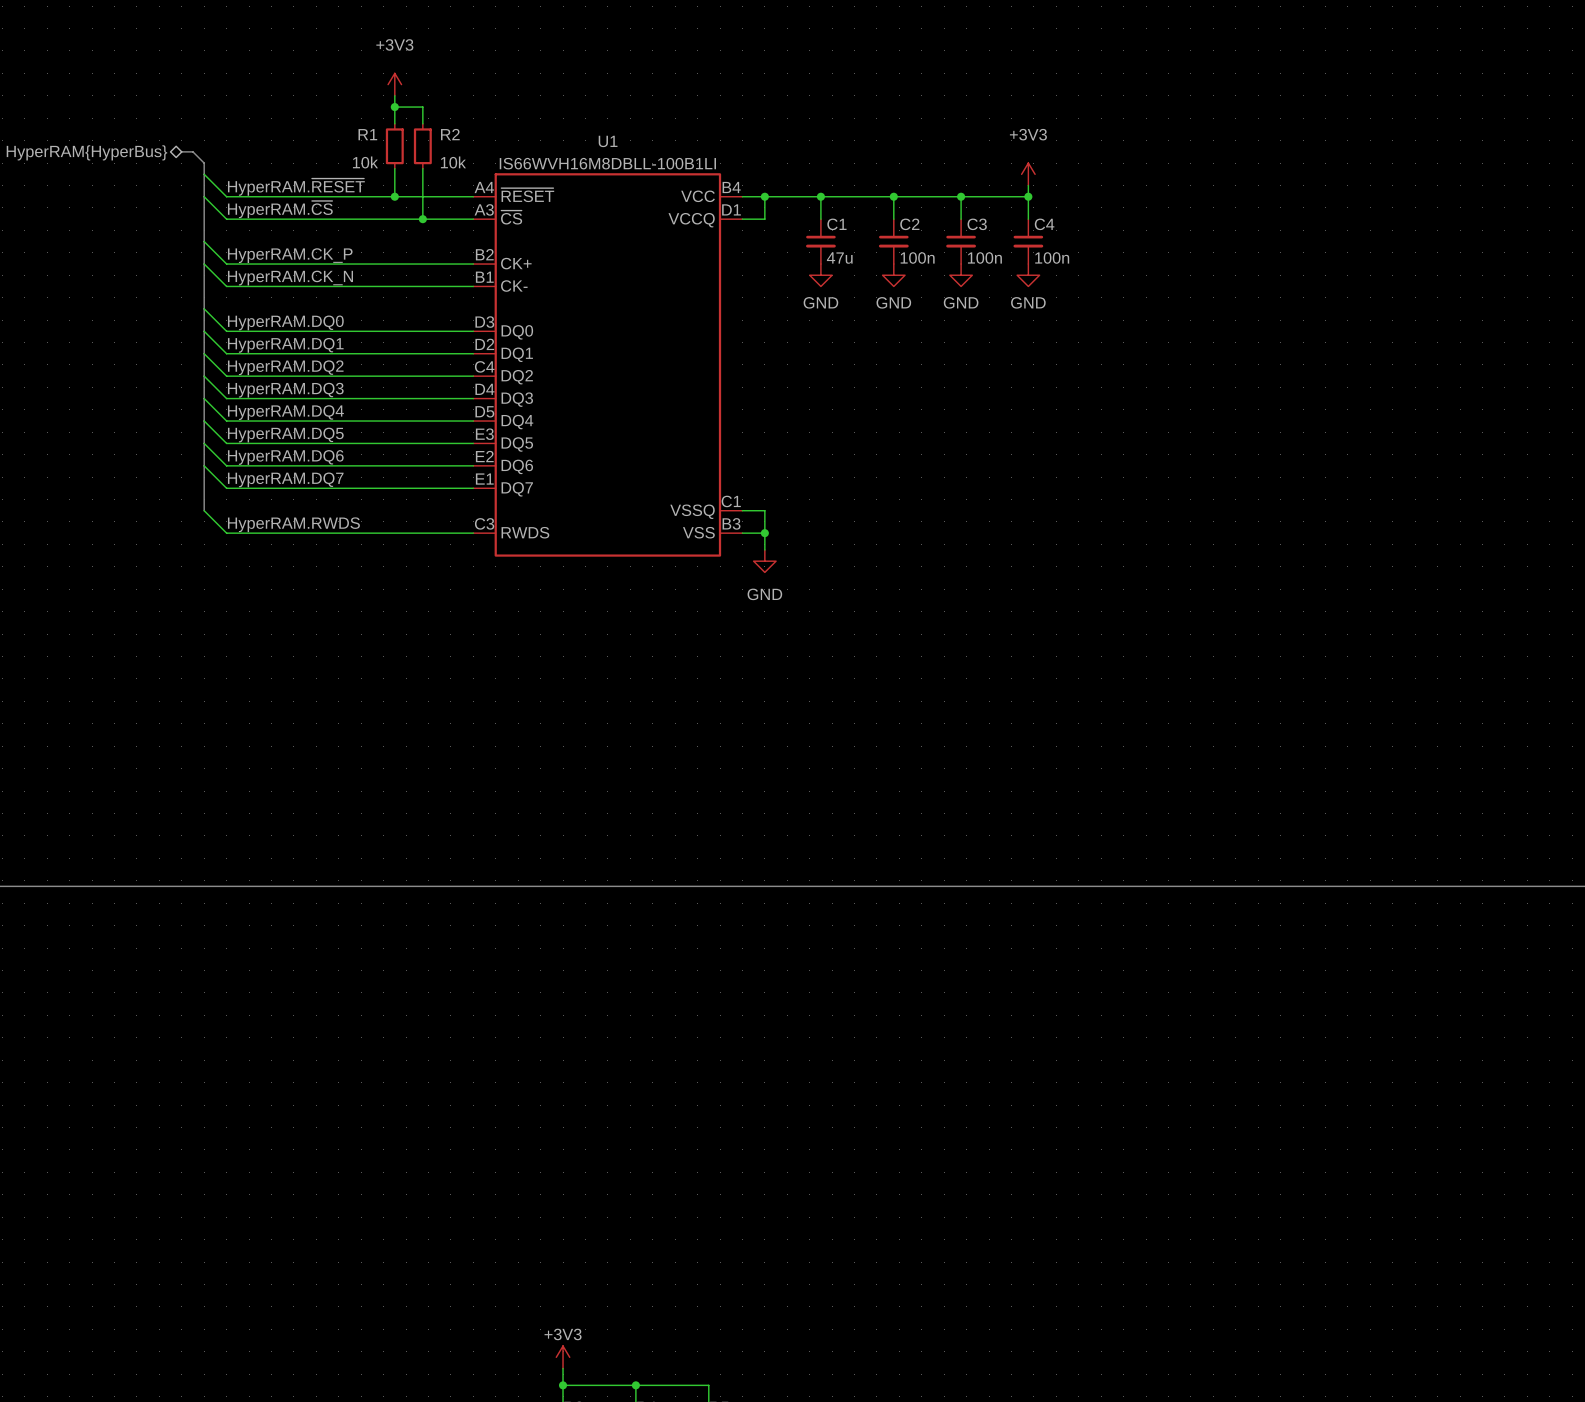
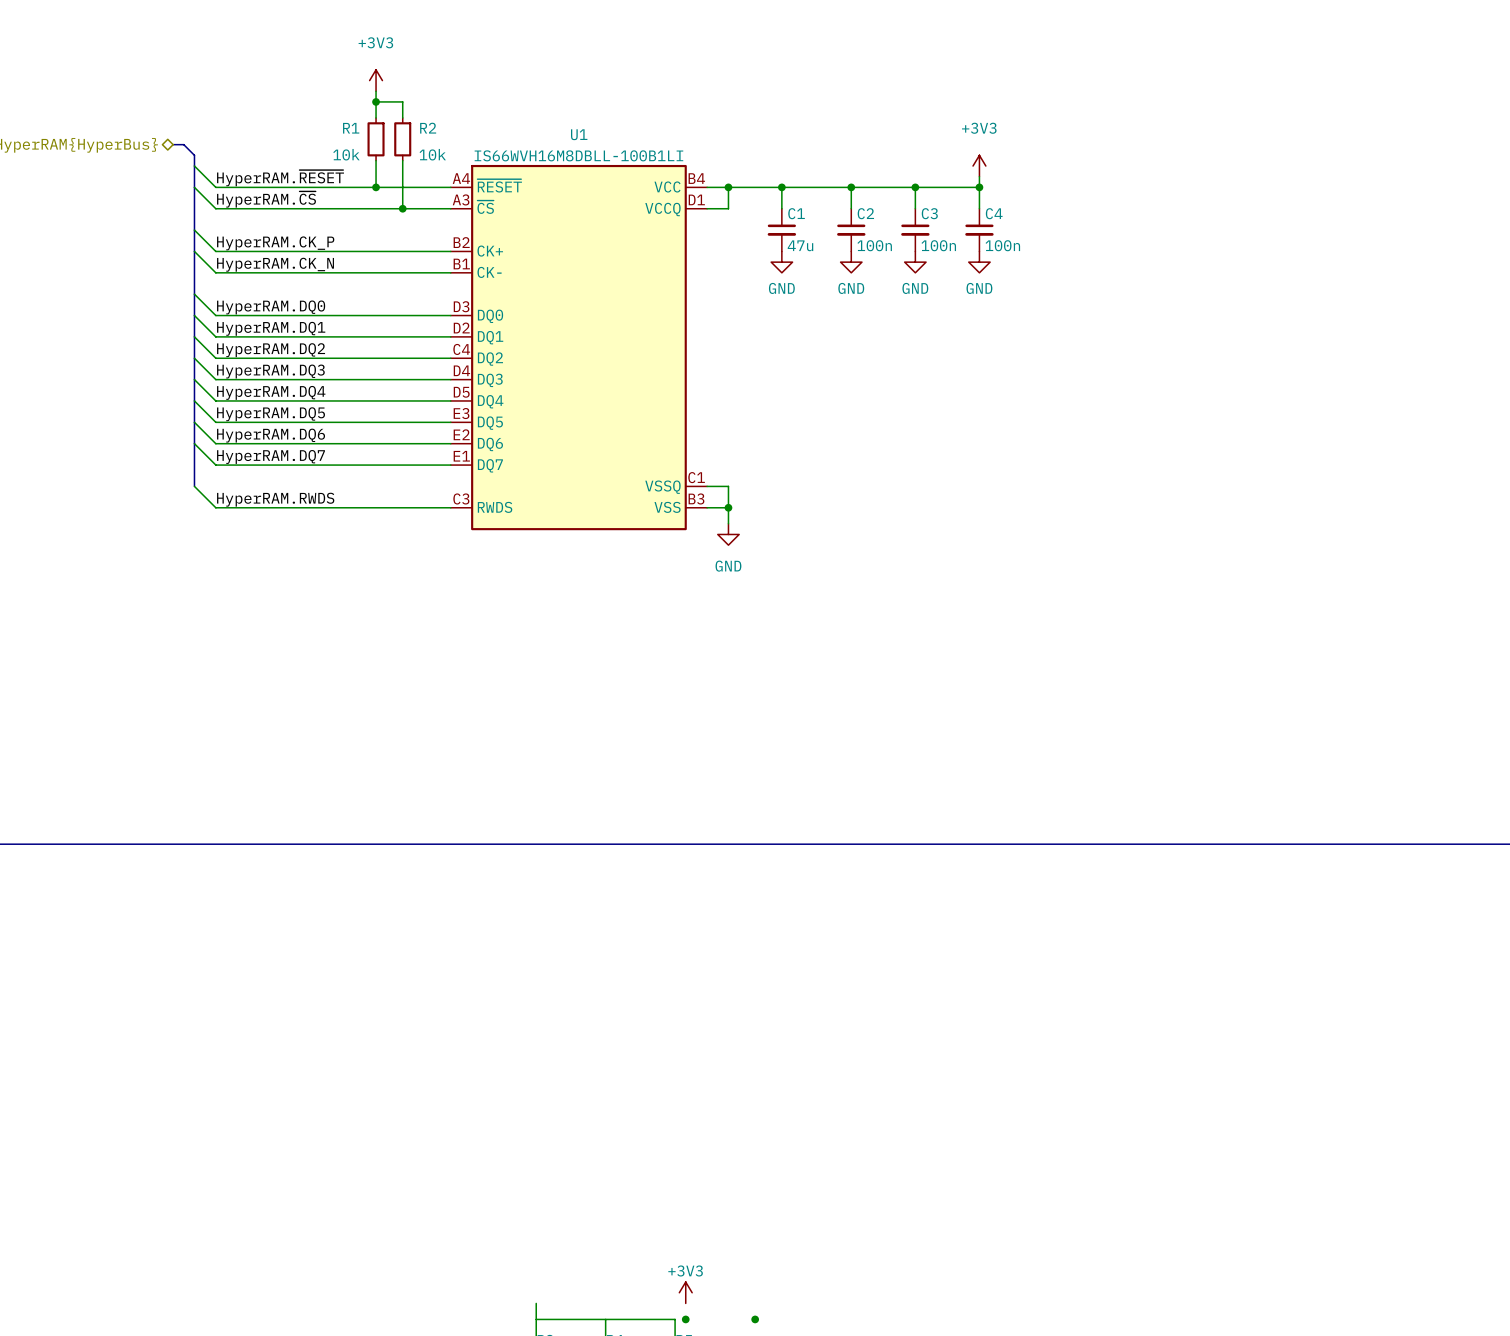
power symbol: +3V3 (563, 1357) -> none
power symbol: none -> +3V3 (685, 1292)
junction: (563, 1385) -> none
junction: (635, 1385) -> none
junction: none -> (685, 1319)
junction: none -> (755, 1319)

